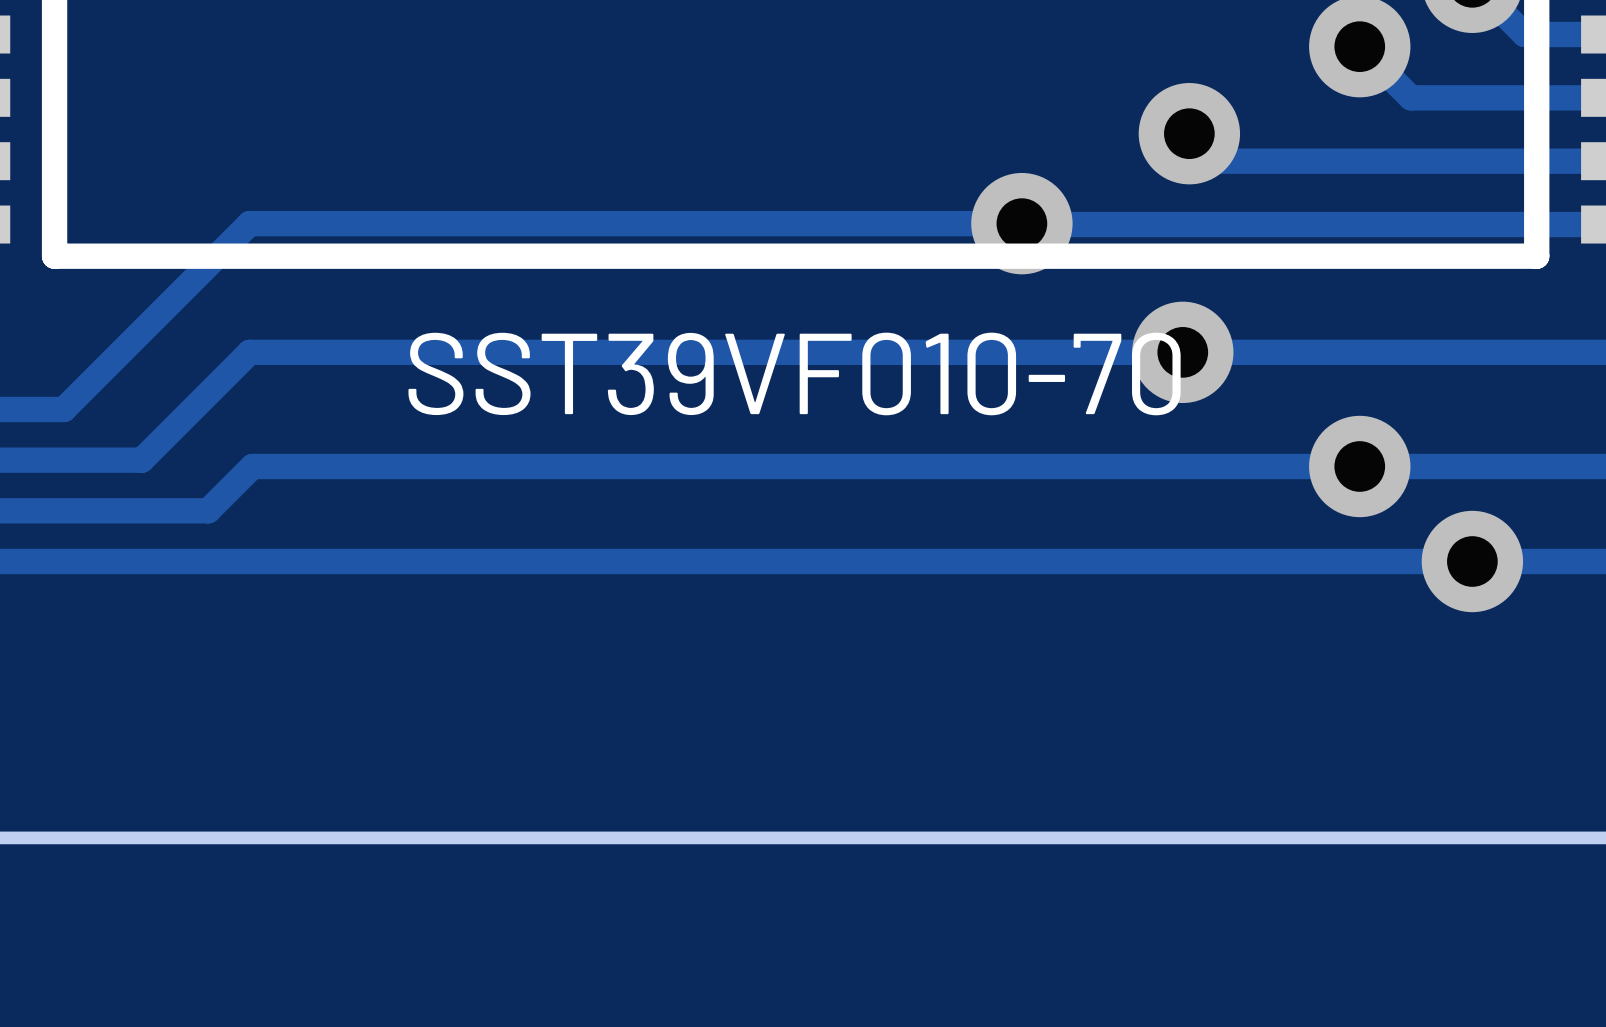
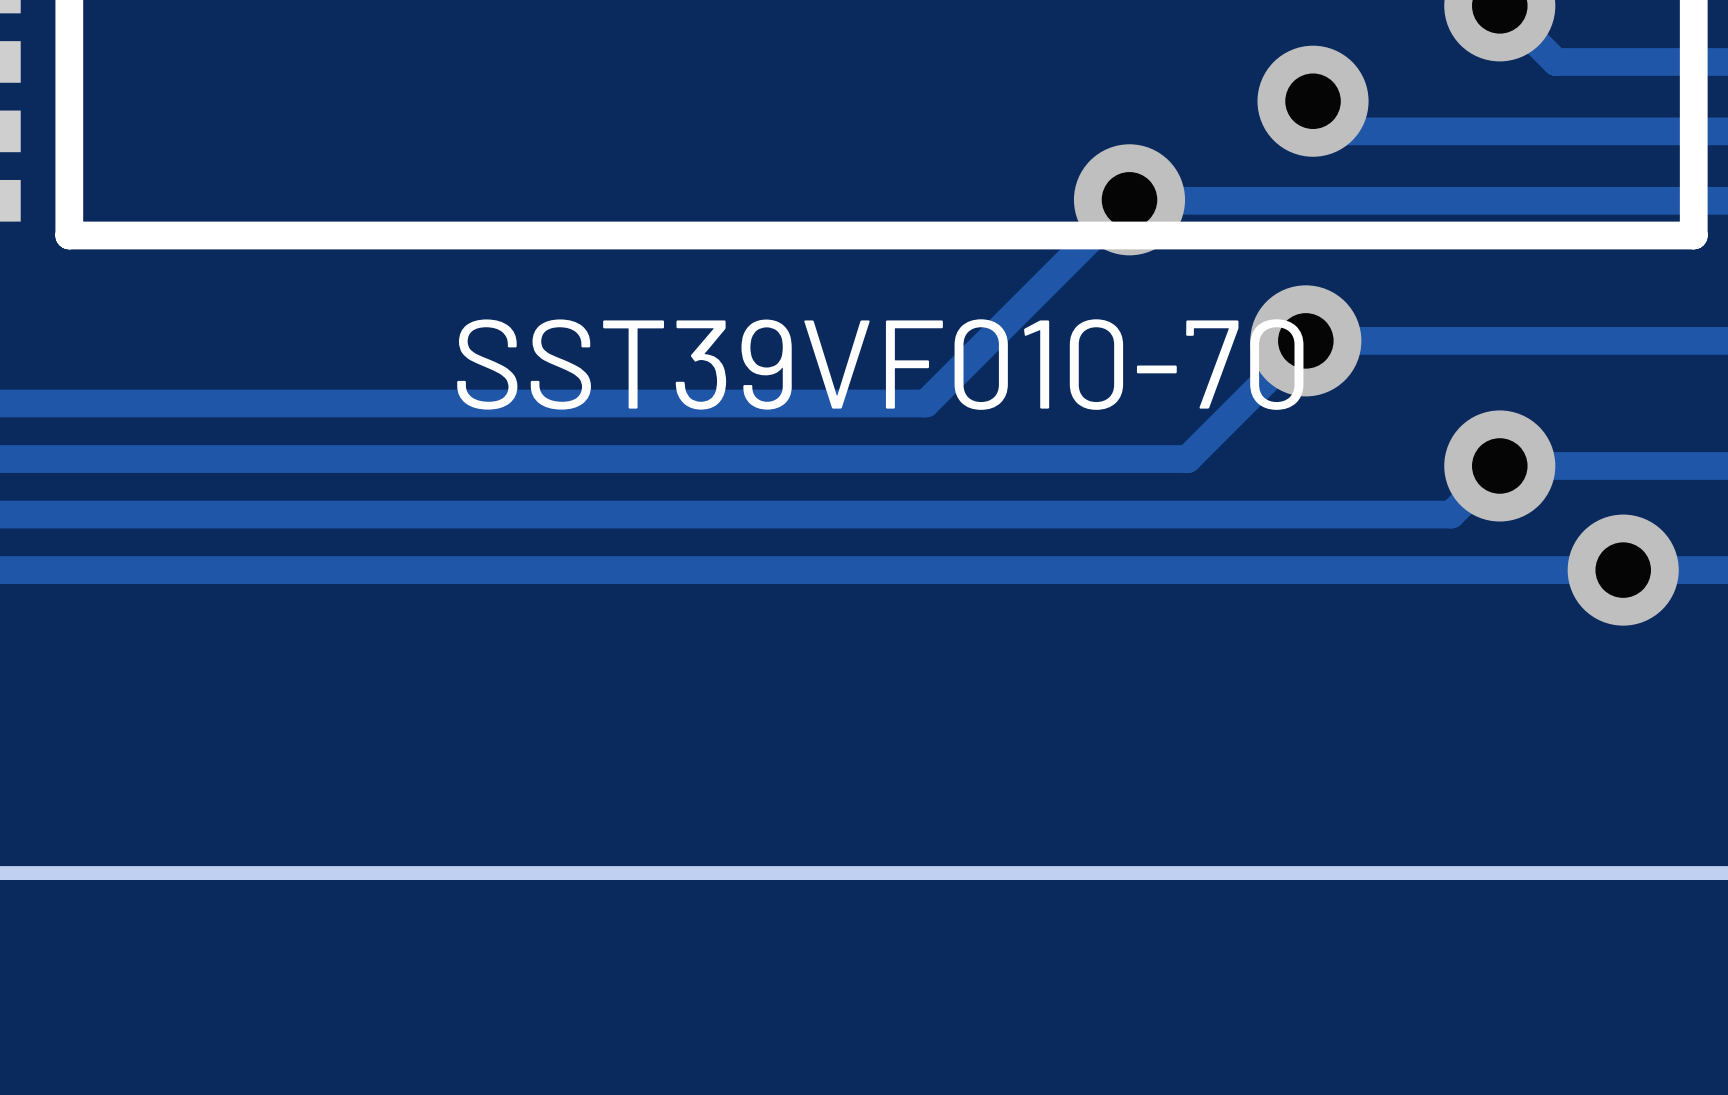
track: (1021, 223) (249, 223) (63, 409) -> (1129, 199) (925, 403) (79, 403)
track: (1182, 352) (249, 352) (141, 460) -> (1305, 340) (1187, 459) (164, 459)
track: (1359, 466) (252, 466) (208, 510) -> (1499, 465) (1451, 514) (237, 514)

